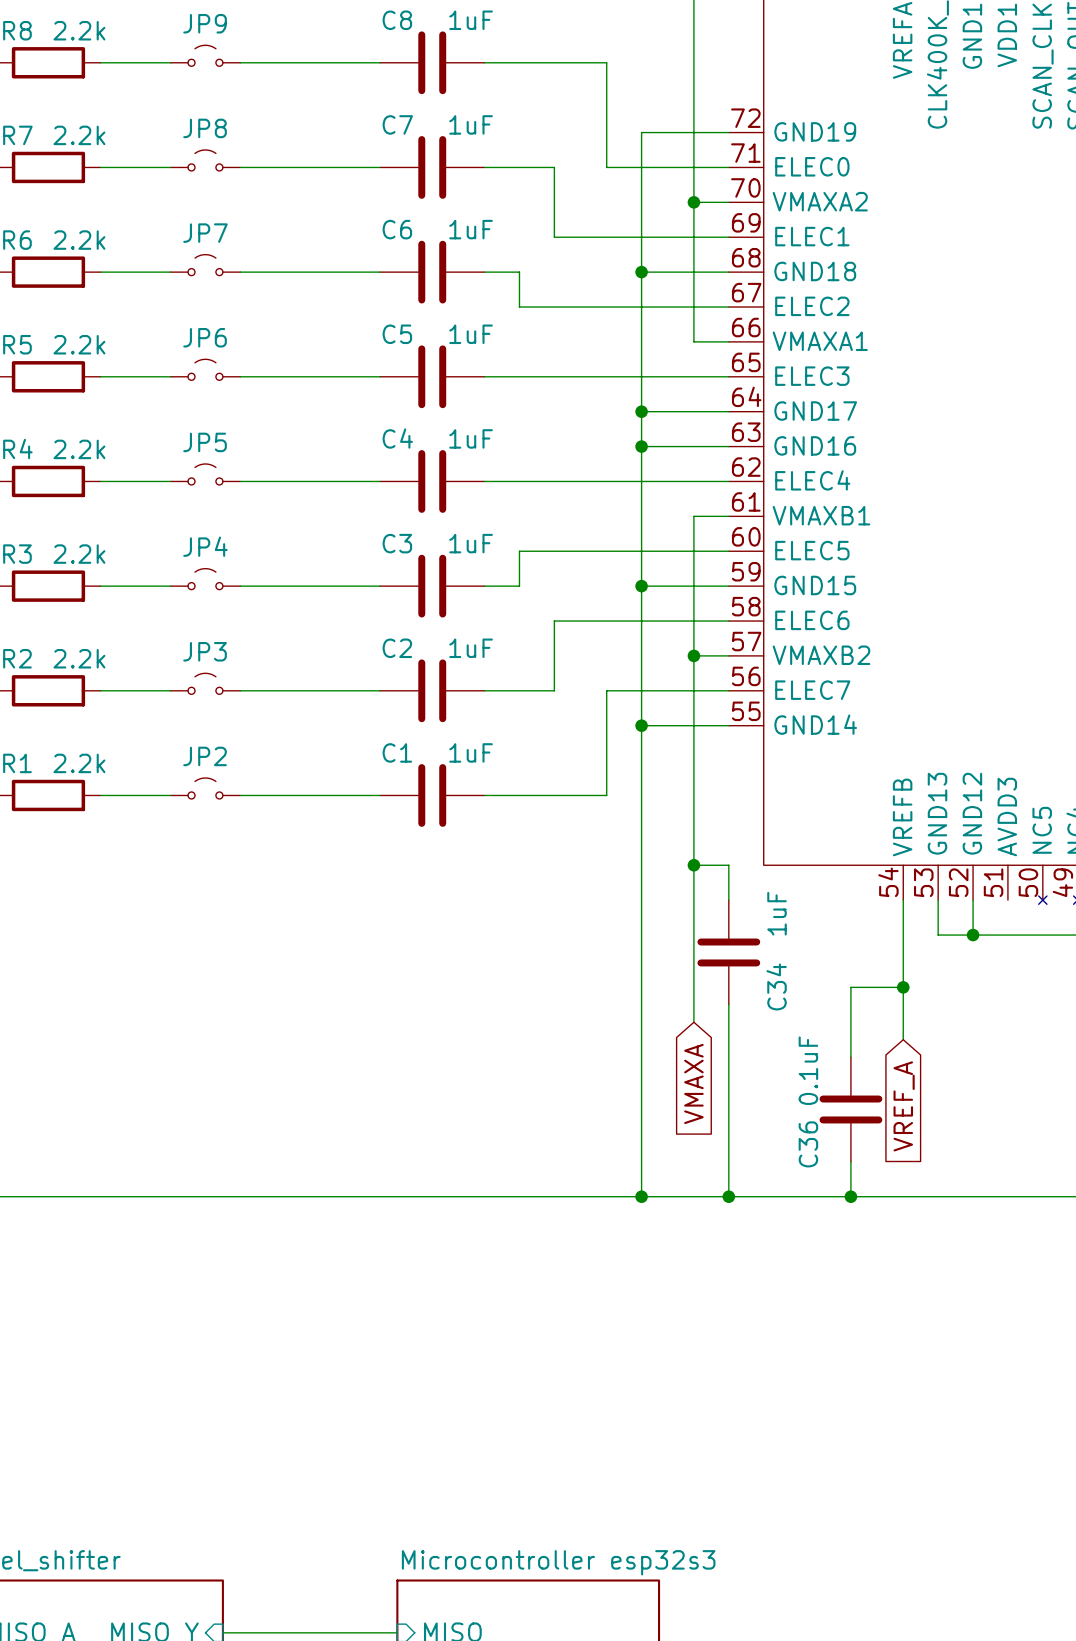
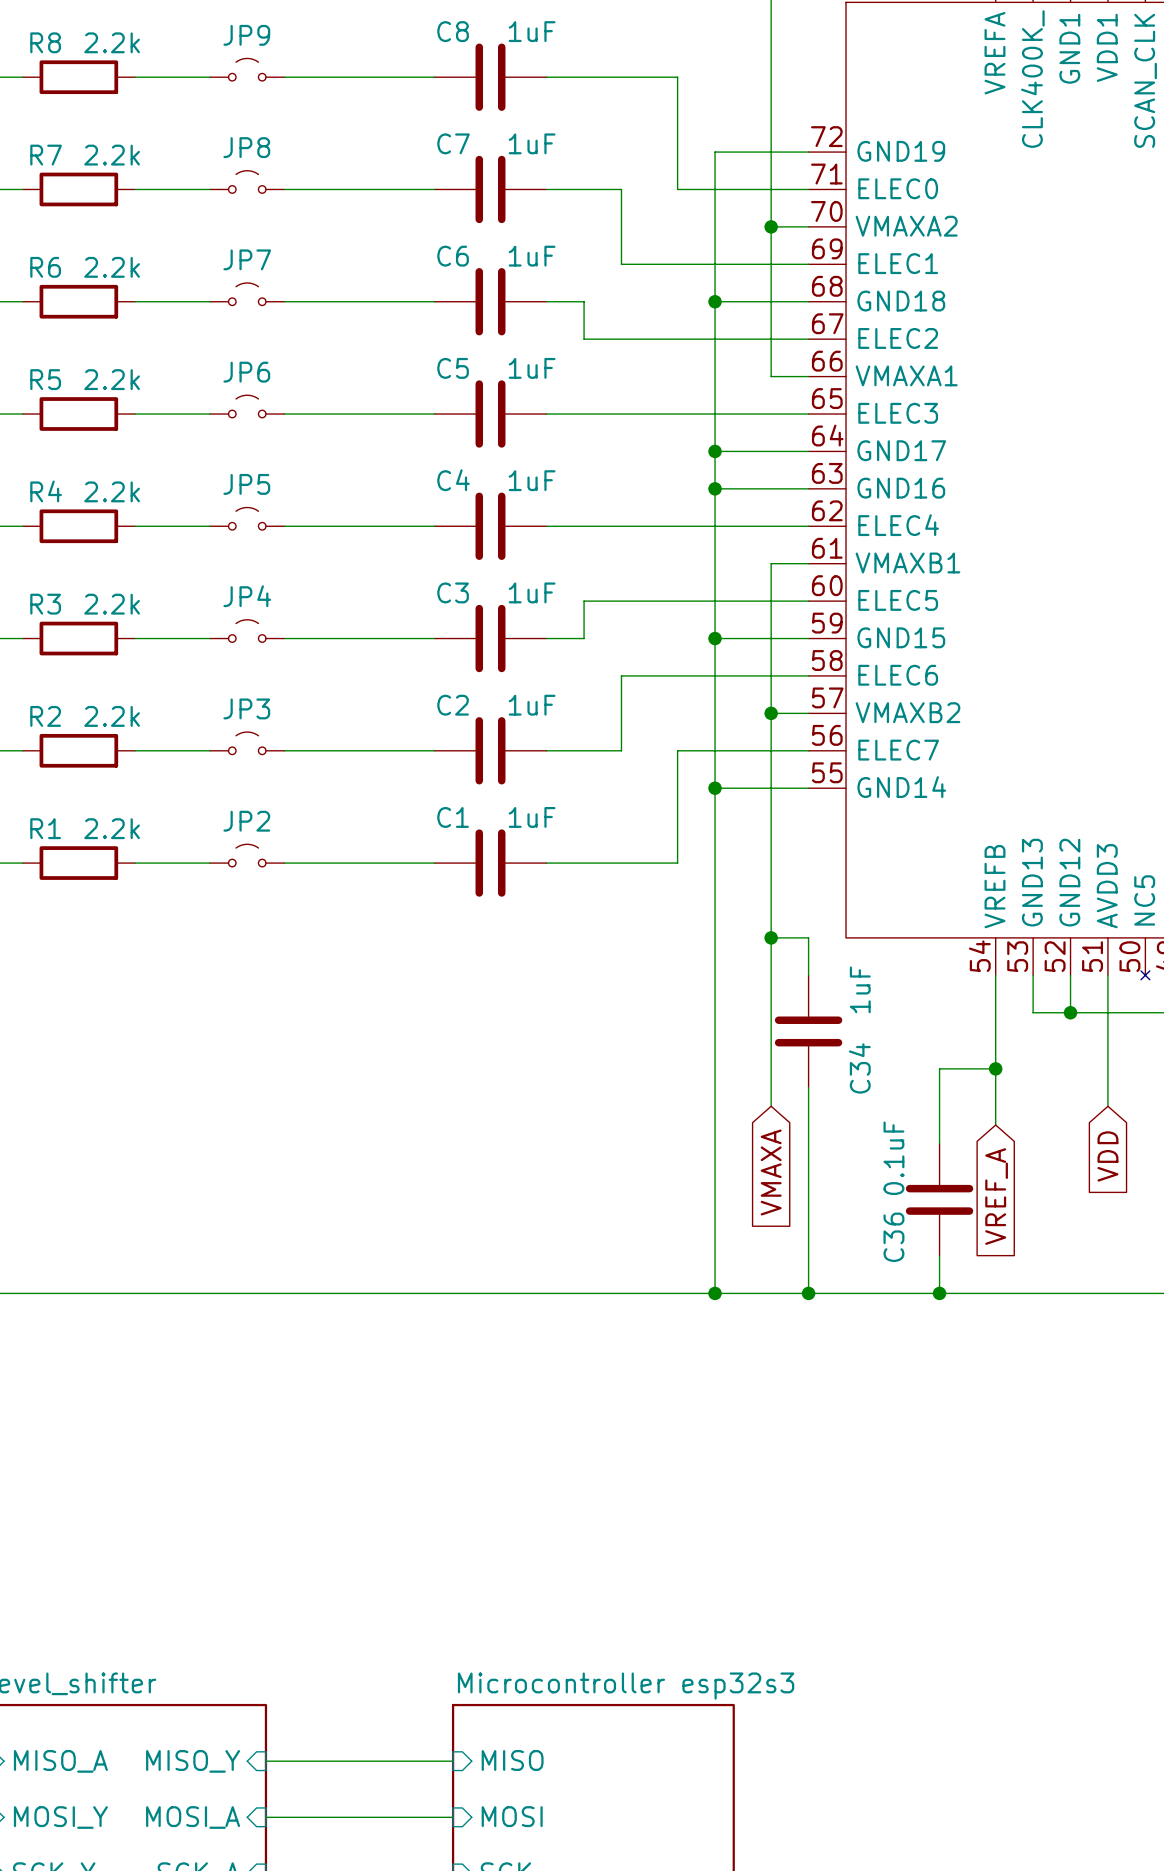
wire: none -> (1107, 975) (1107, 1106)
global label: none -> VDD (1107, 1156)

